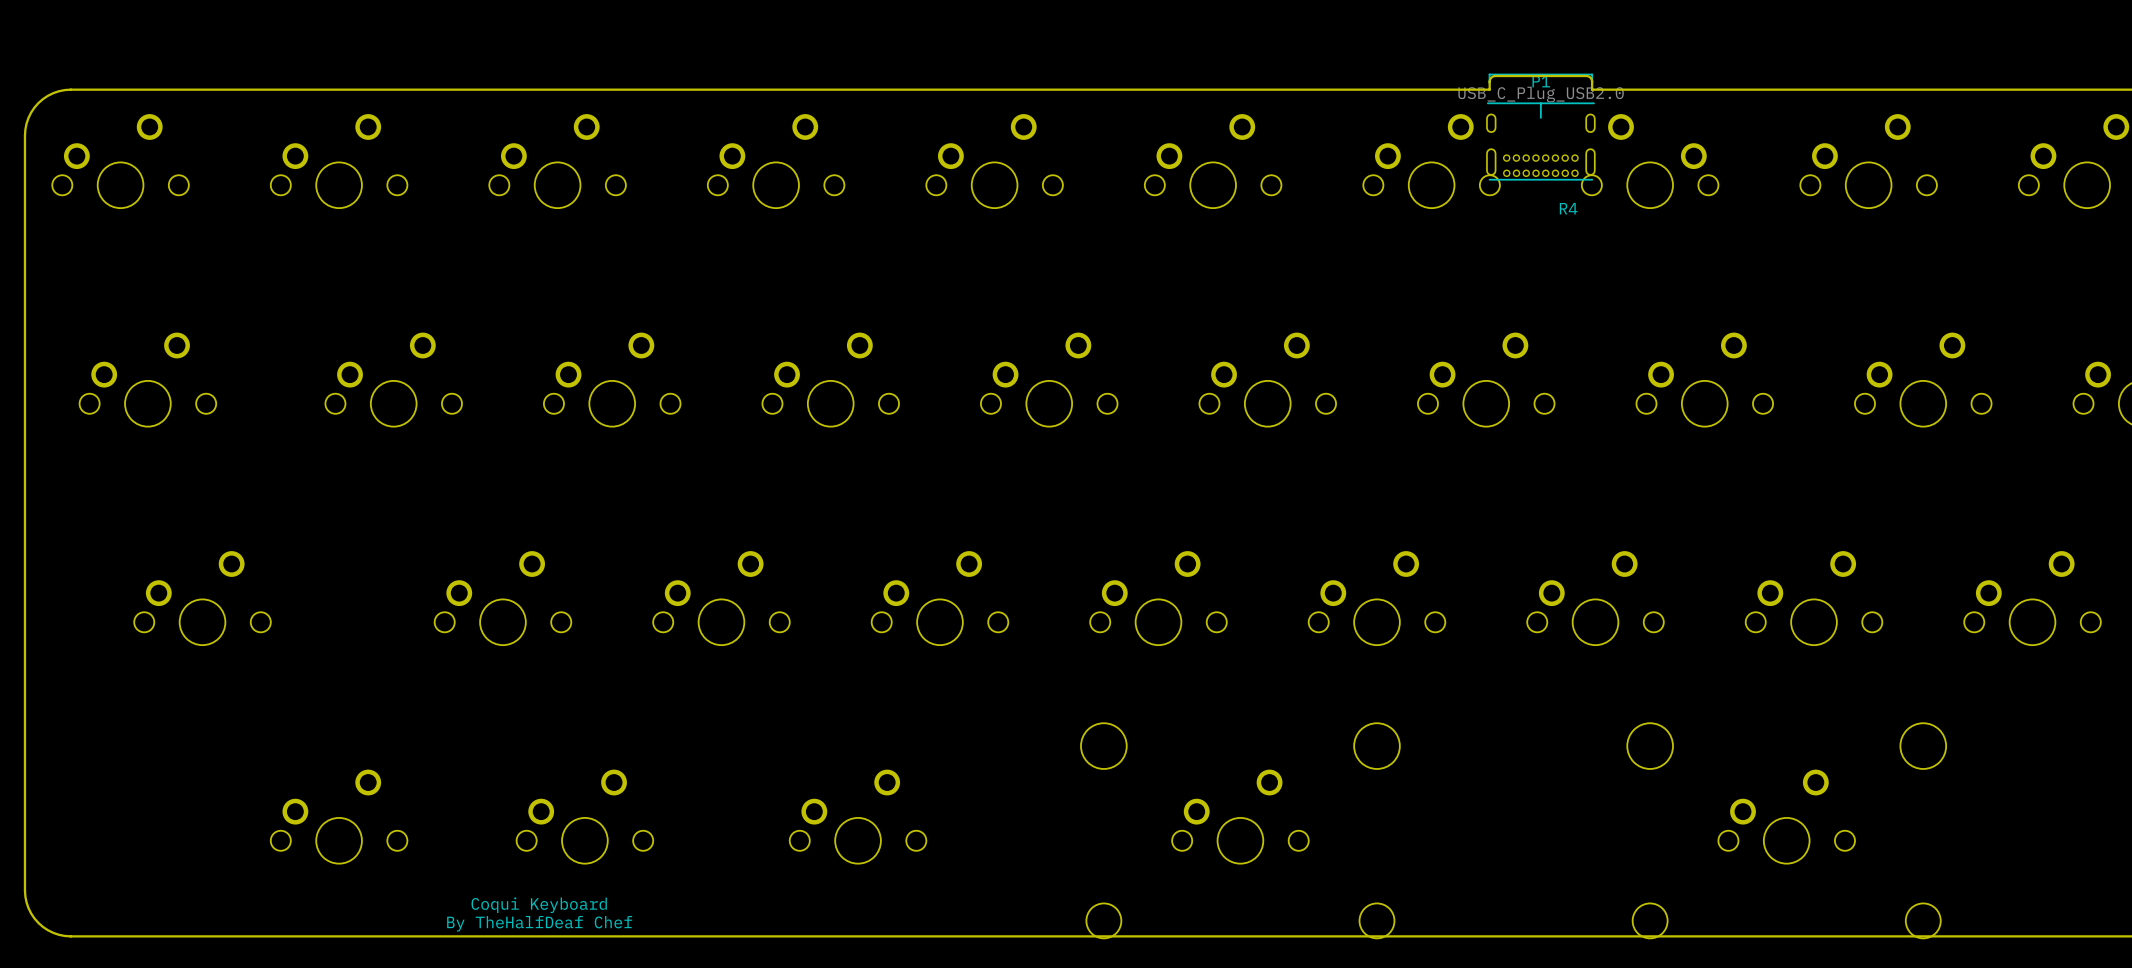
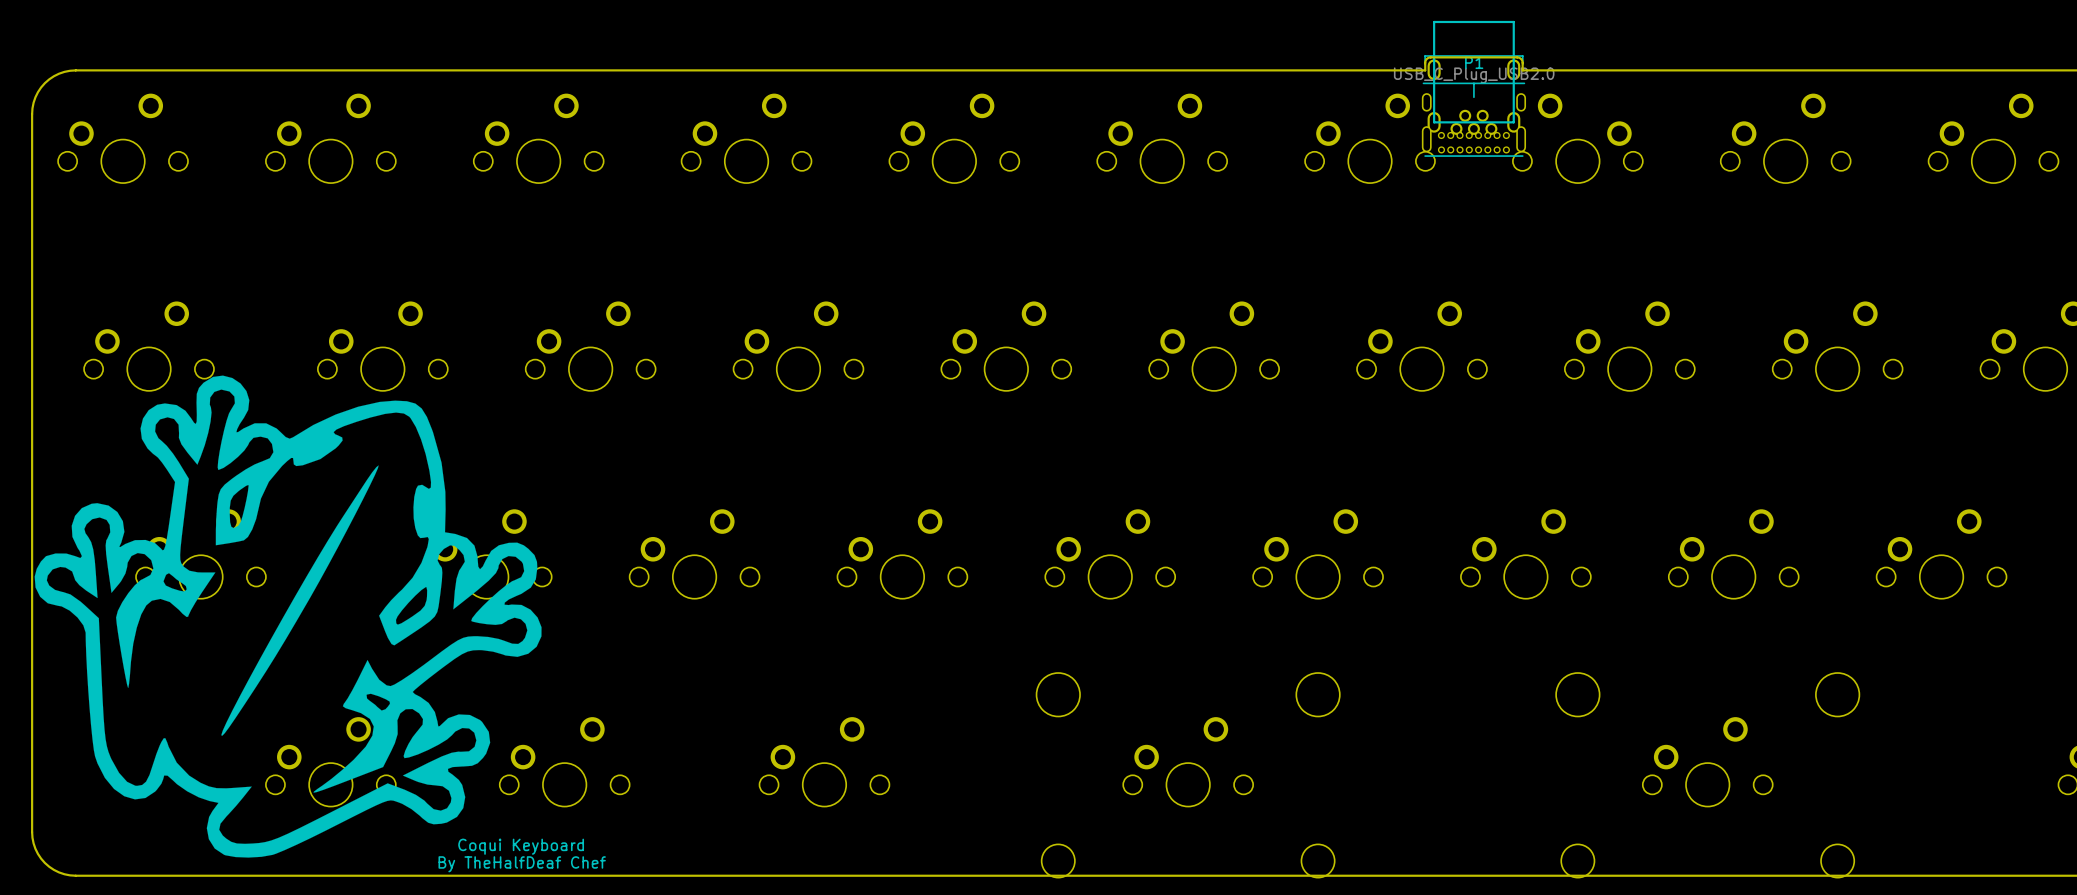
part: none -> (1473, 77)
R4: (1568, 208) -> none
drawing: none -> [34, 375, 542, 858]

